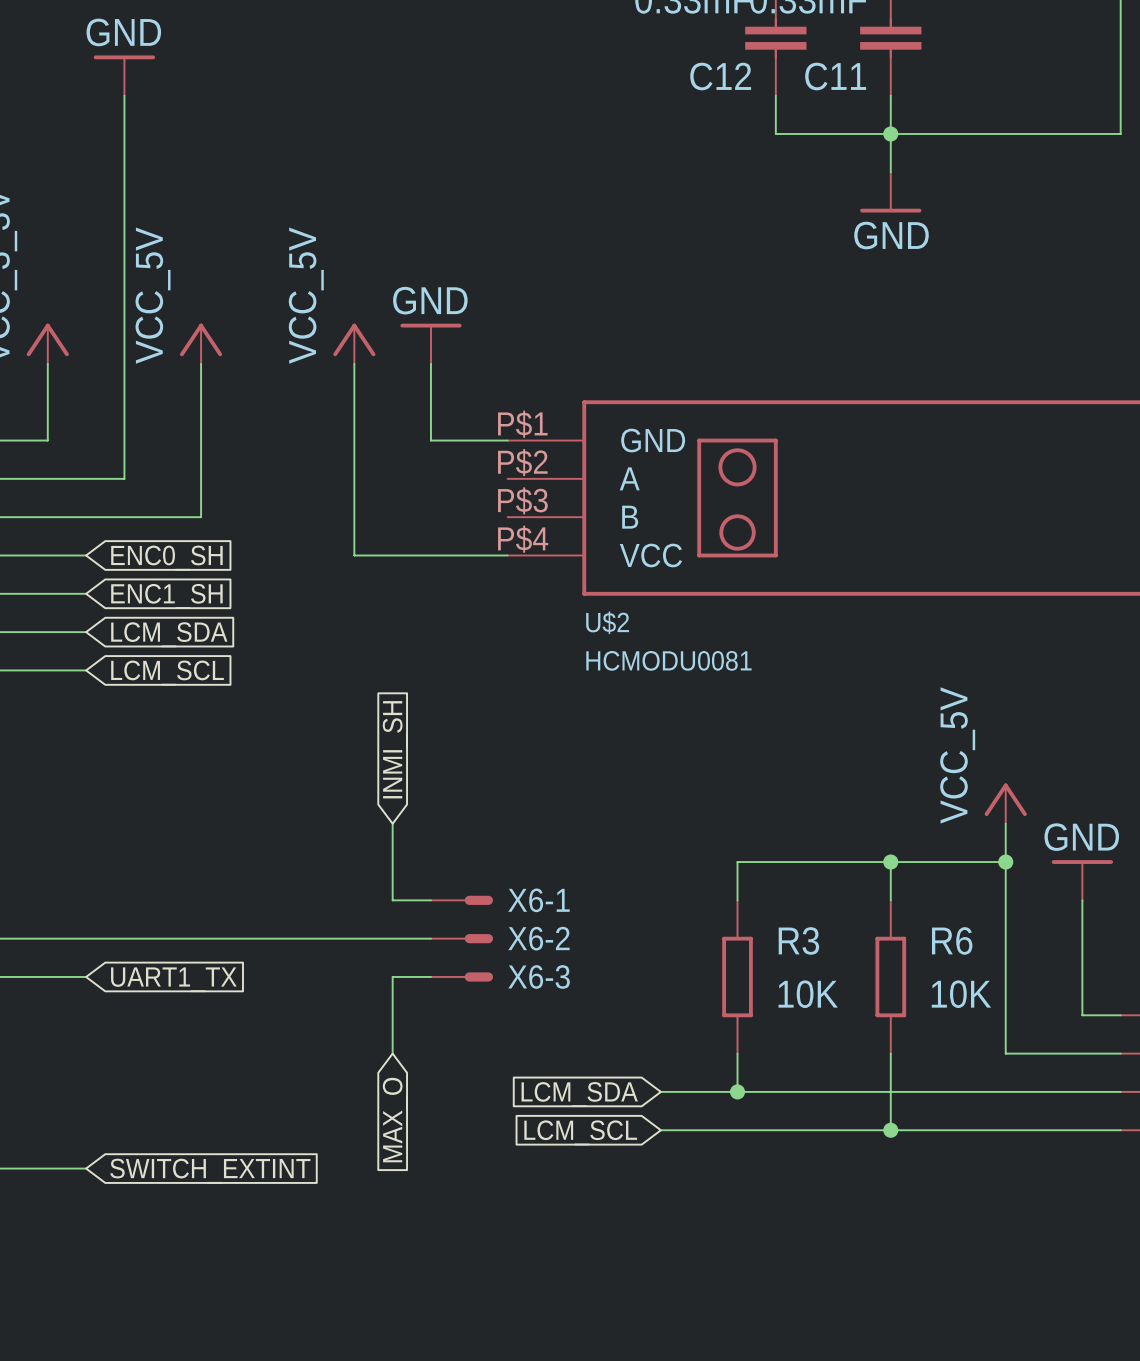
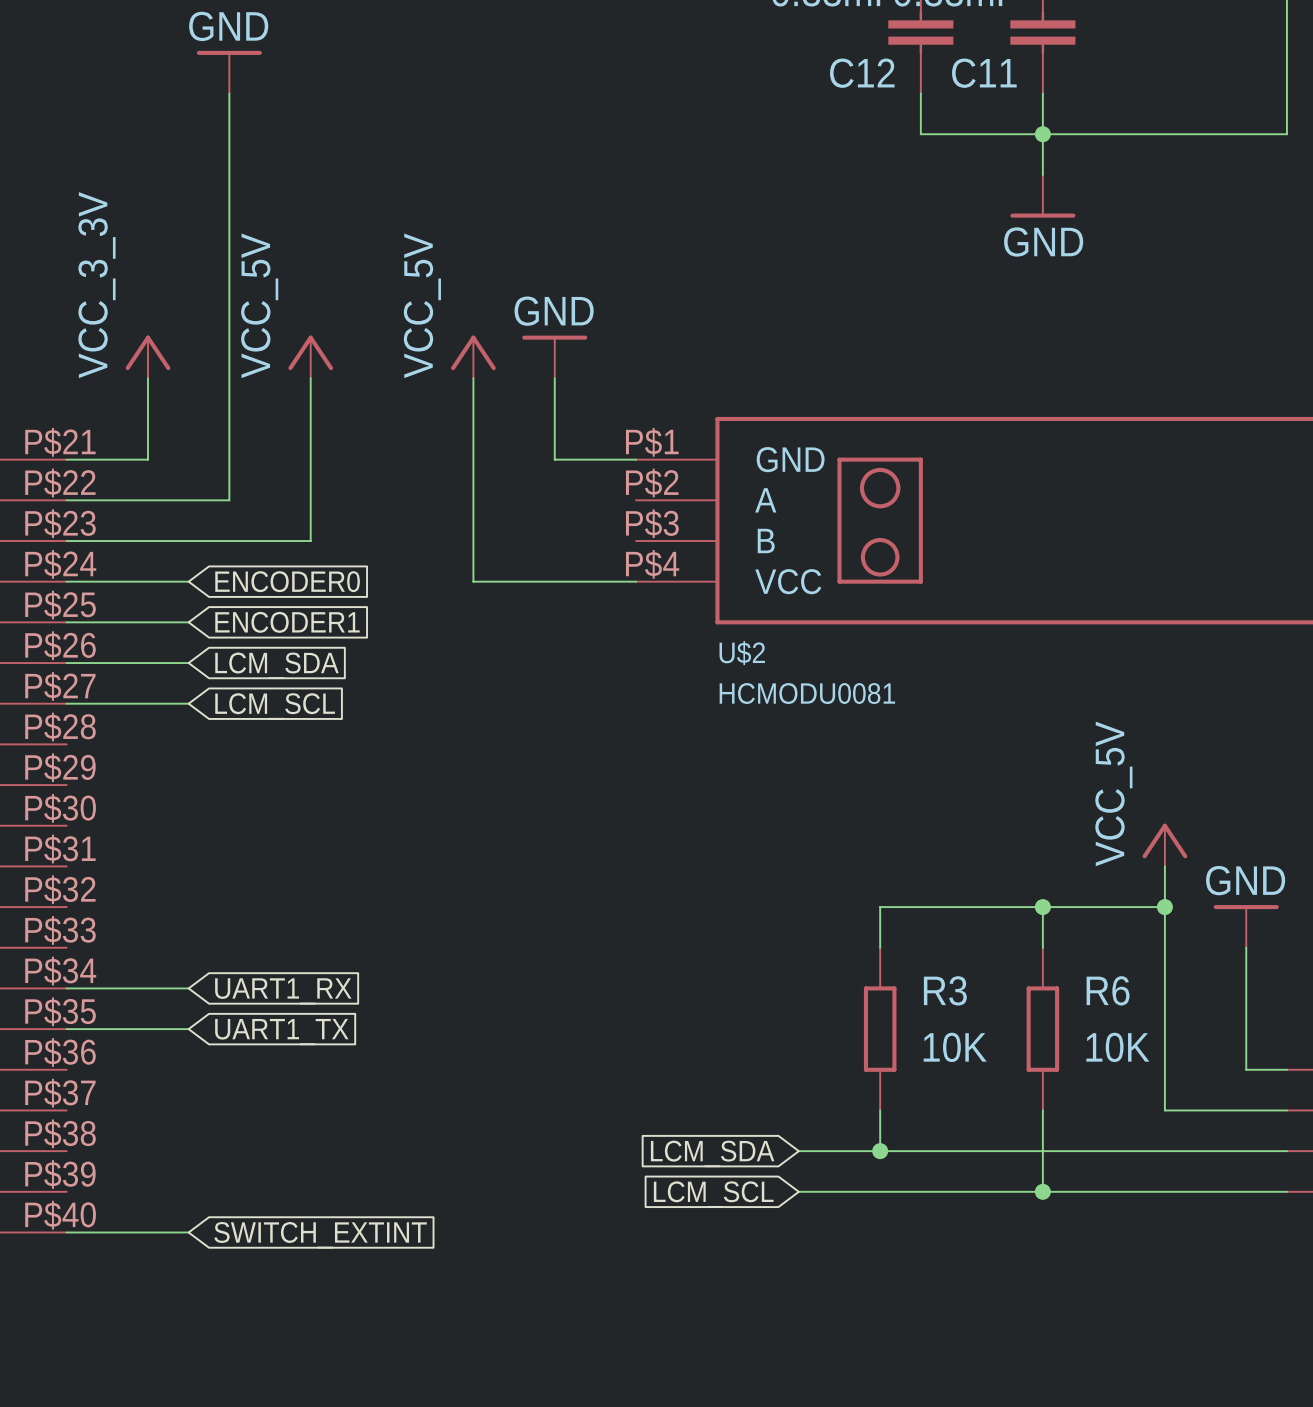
global label: ENC0_SH (166, 558) -> ENCODER0 (287, 581)
global label: ENC1_SH (166, 596) -> ENCODER1 (287, 622)
global label: INMI_SH (395, 749) -> none
wire: (392, 823) (392, 900) (430, 900) -> none
X6-1: (462, 900) -> none
wire: (86, 938) (430, 938) -> none
X6-2: (462, 938) -> none
global label: none -> UART1_RX (283, 991)
wire: (430, 976) (392, 976) (392, 1053) -> none
X6-3: (462, 976) -> none
global label: MAX_O (395, 1120) -> none

